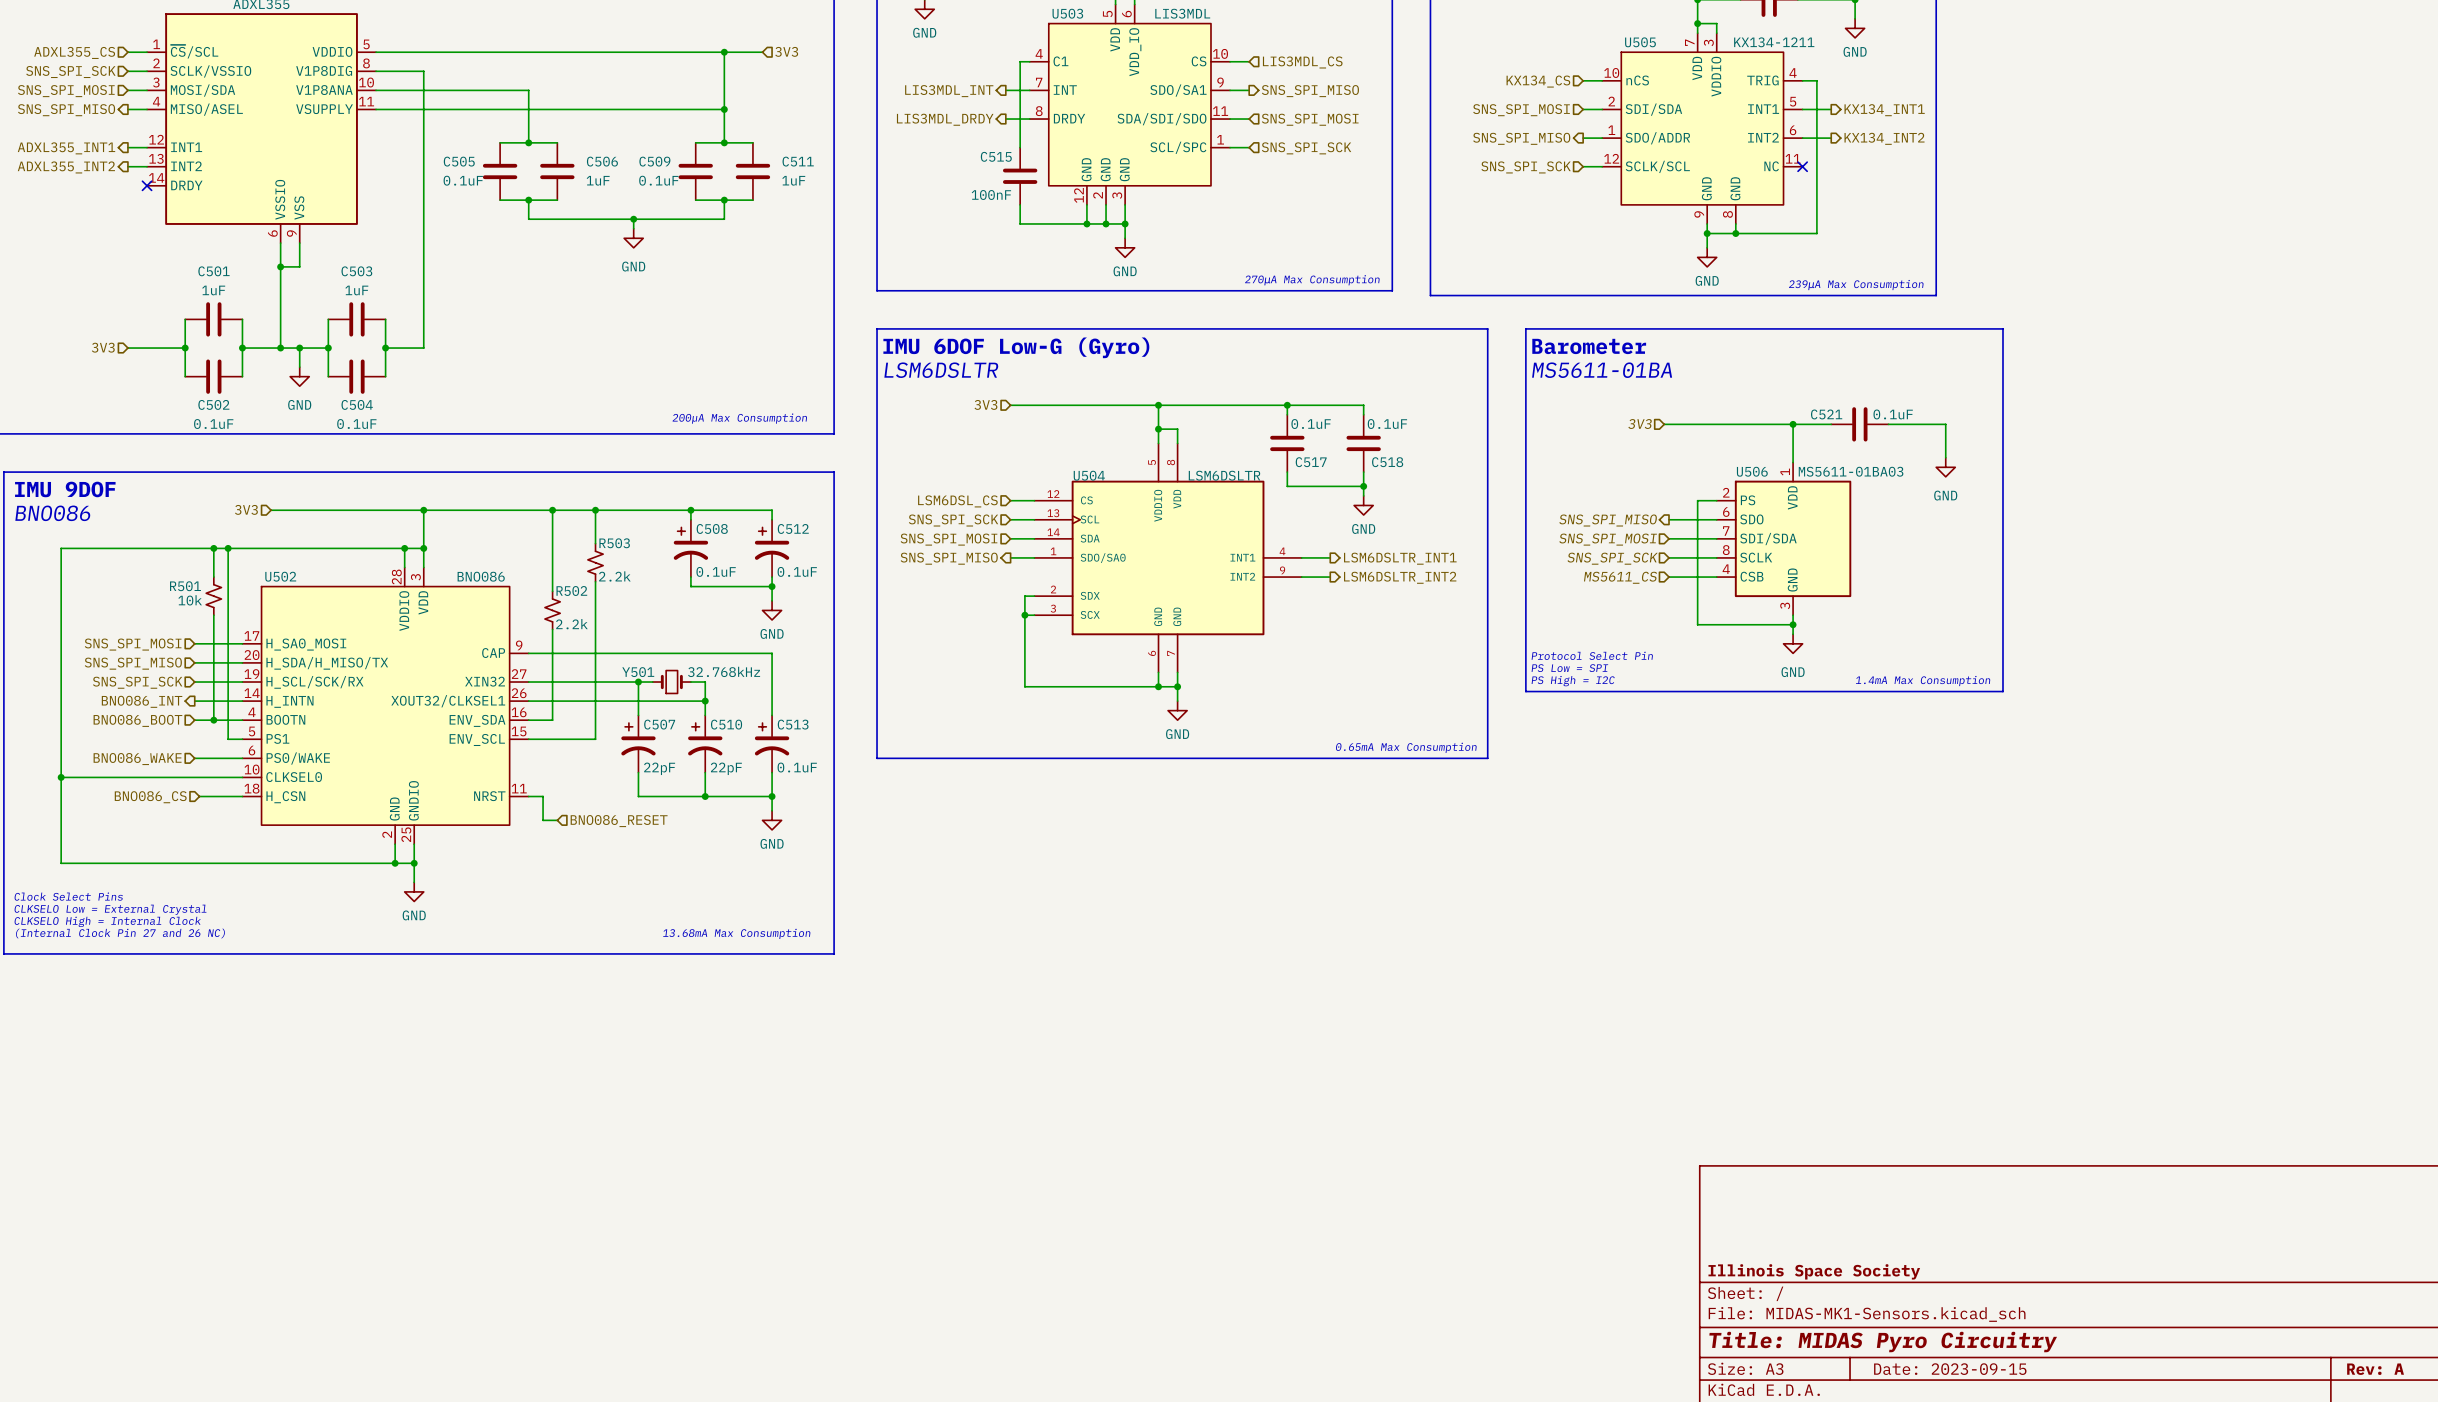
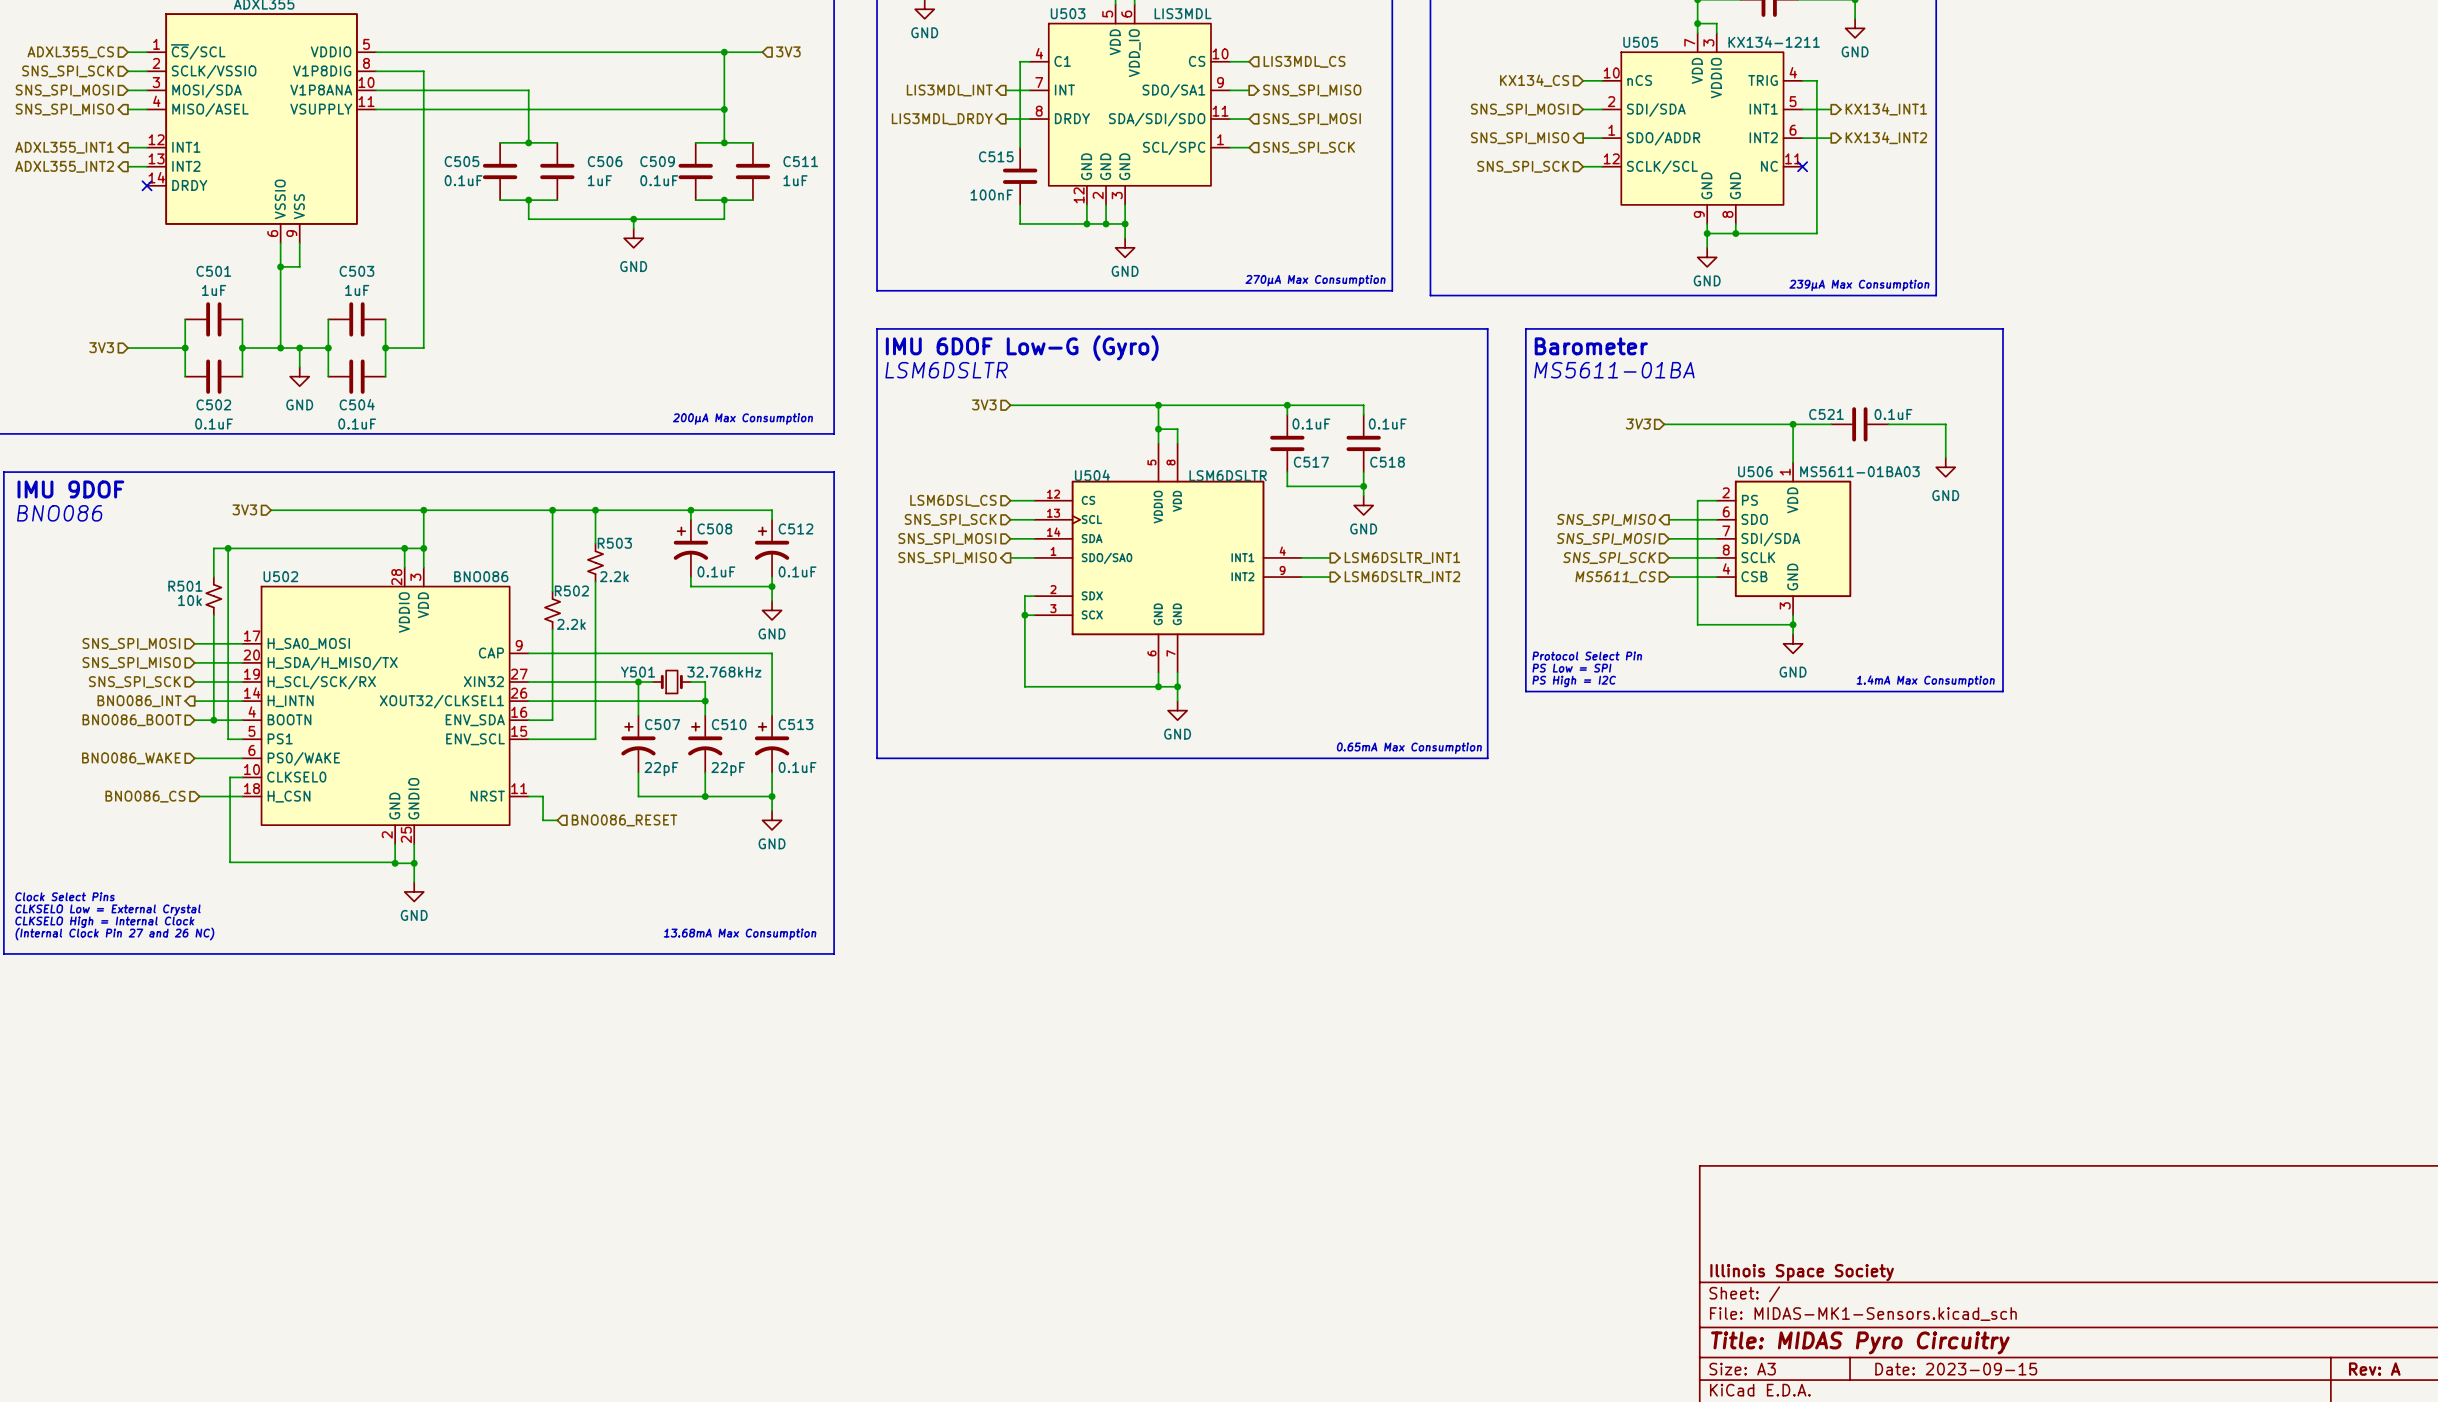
wire: (213, 548) (61, 548) (61, 863) (395, 863) -> none
junction: (213, 548) -> none
wire: (61, 777) (230, 777) -> (395, 862) (230, 862) (230, 777)
junction: (61, 777) -> none

